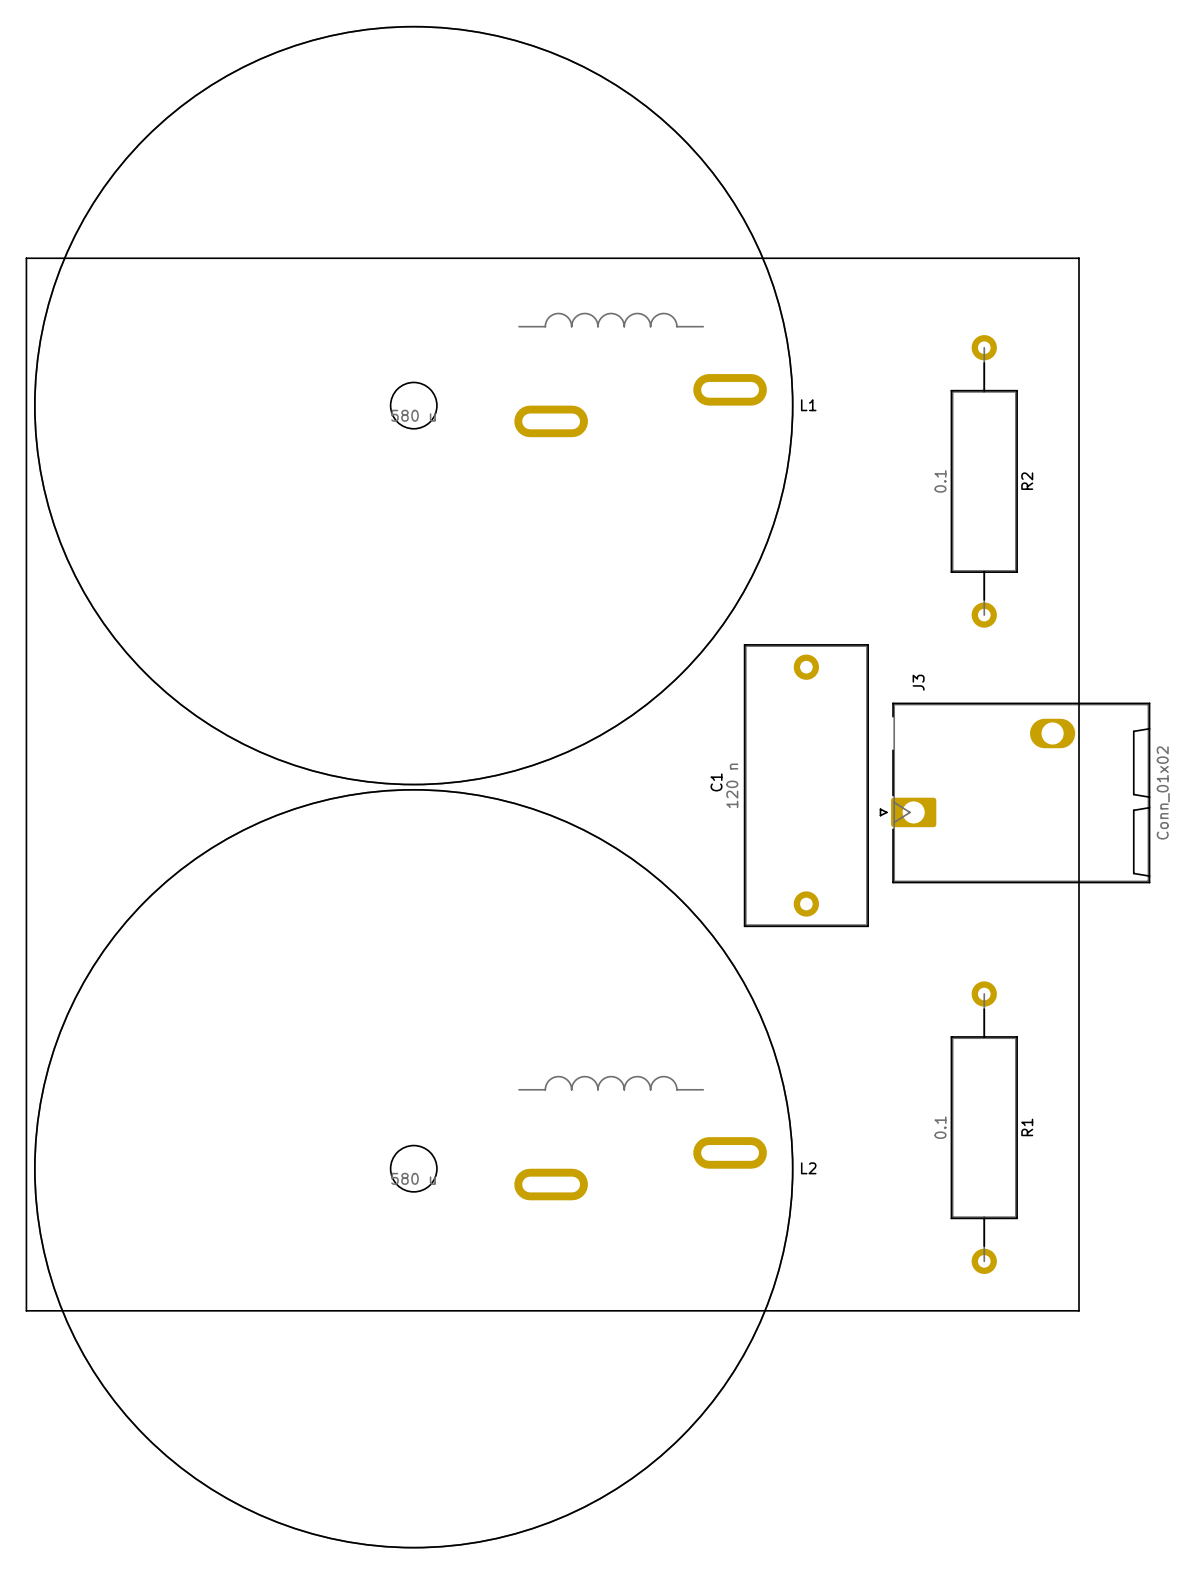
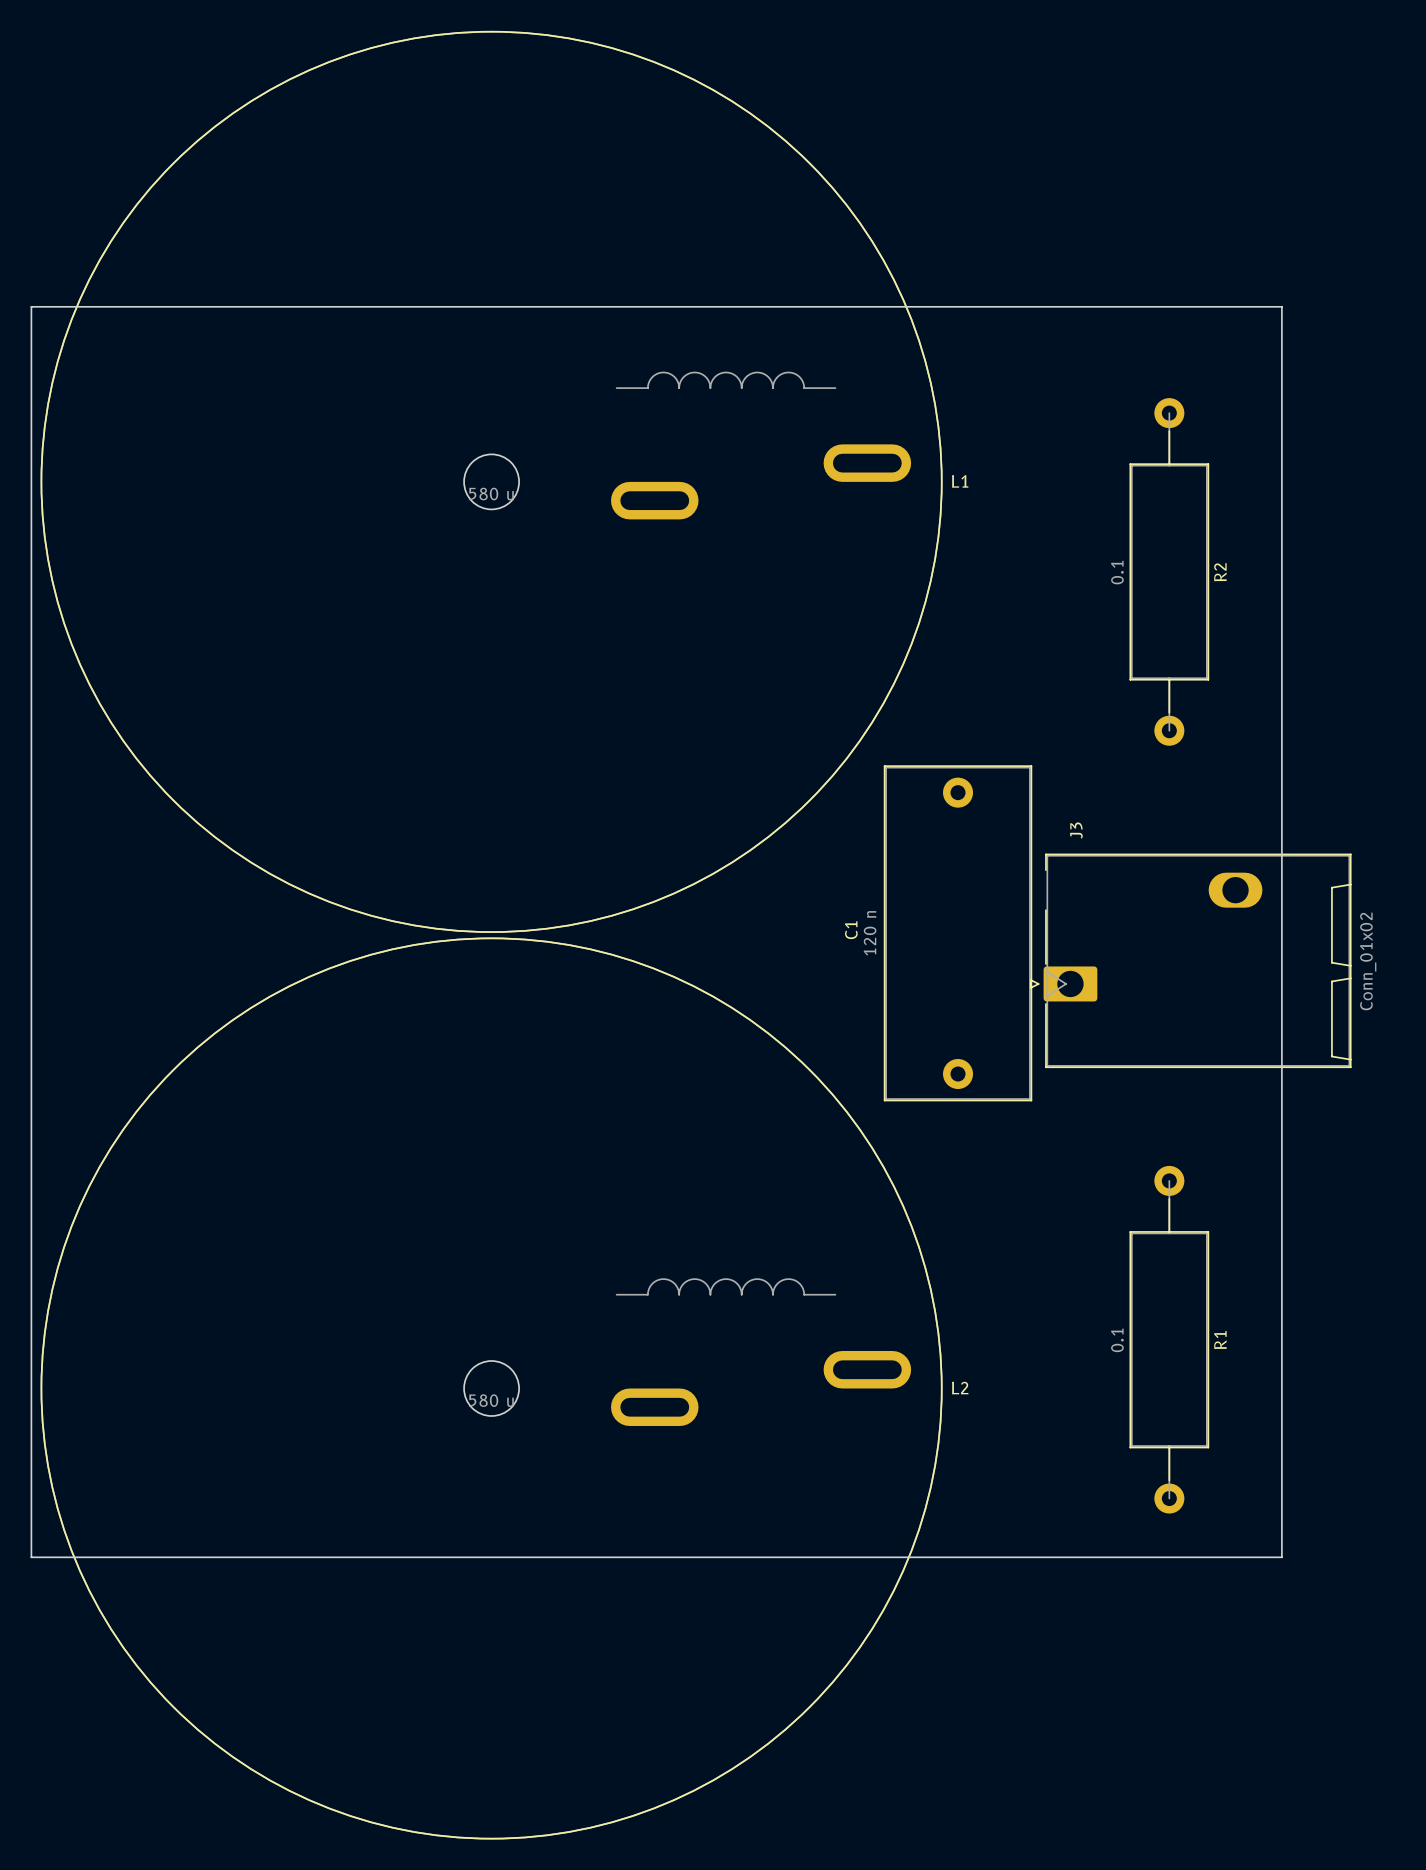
J3 position: (1015, 792) -> (1190, 960)

